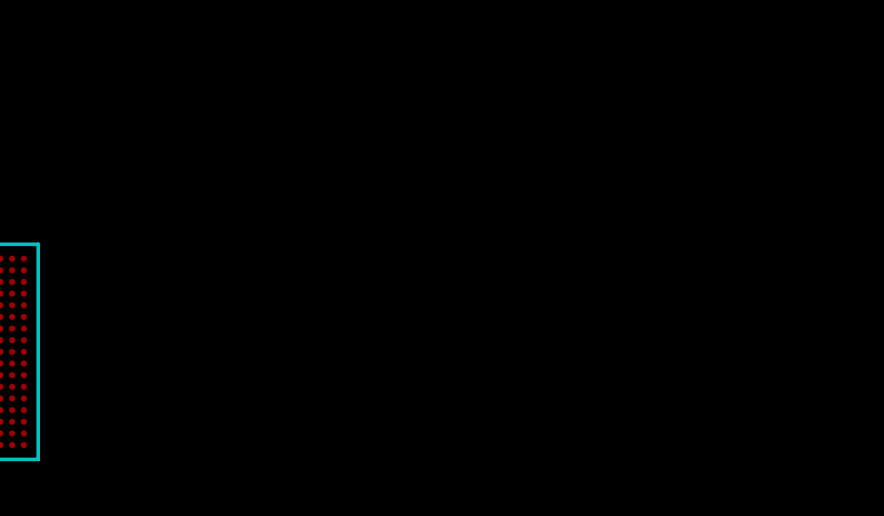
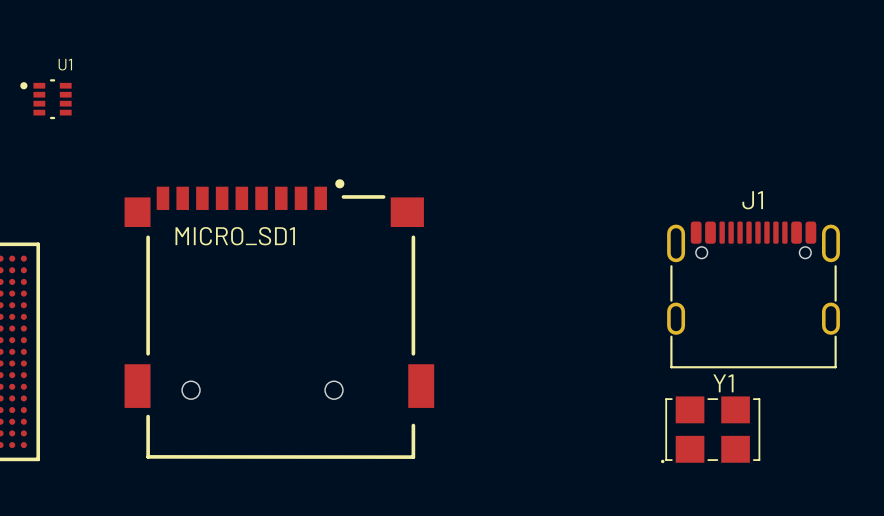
U1: none -> (45, 99)
J1: none -> (753, 294)
MICRO_SD1: none -> (279, 319)
Y1: none -> (710, 429)

